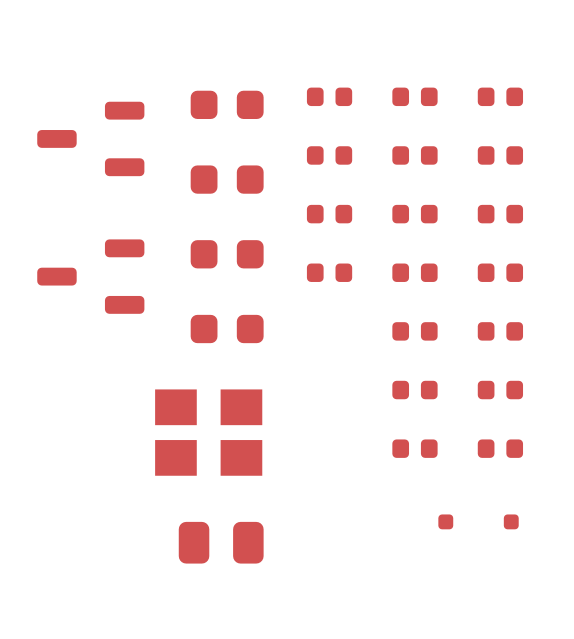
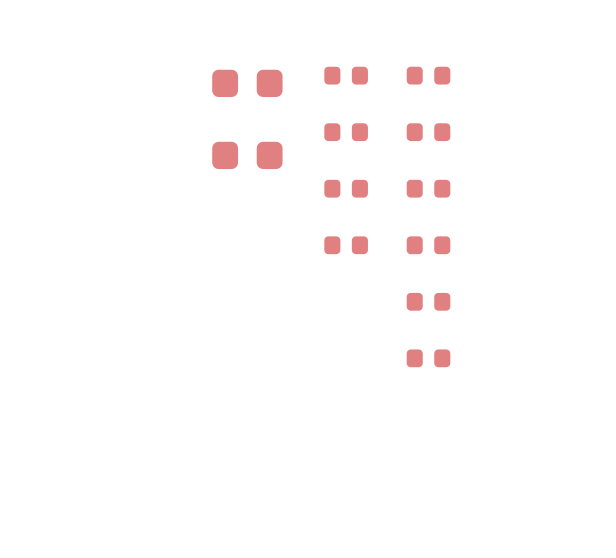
part: (500, 96) -> none
part: (90, 138) -> none
part: (500, 155) -> none
part: (500, 214) -> none
part: (227, 254) -> none
part: (500, 272) -> none
part: (90, 276) -> none
part: (227, 329) -> none
part: (500, 331) -> none
part: (500, 390) -> none
part: (208, 432) -> none
part: (414, 448) -> none
part: (500, 448) -> none
part: (478, 521) -> none
part: (221, 542) -> none

